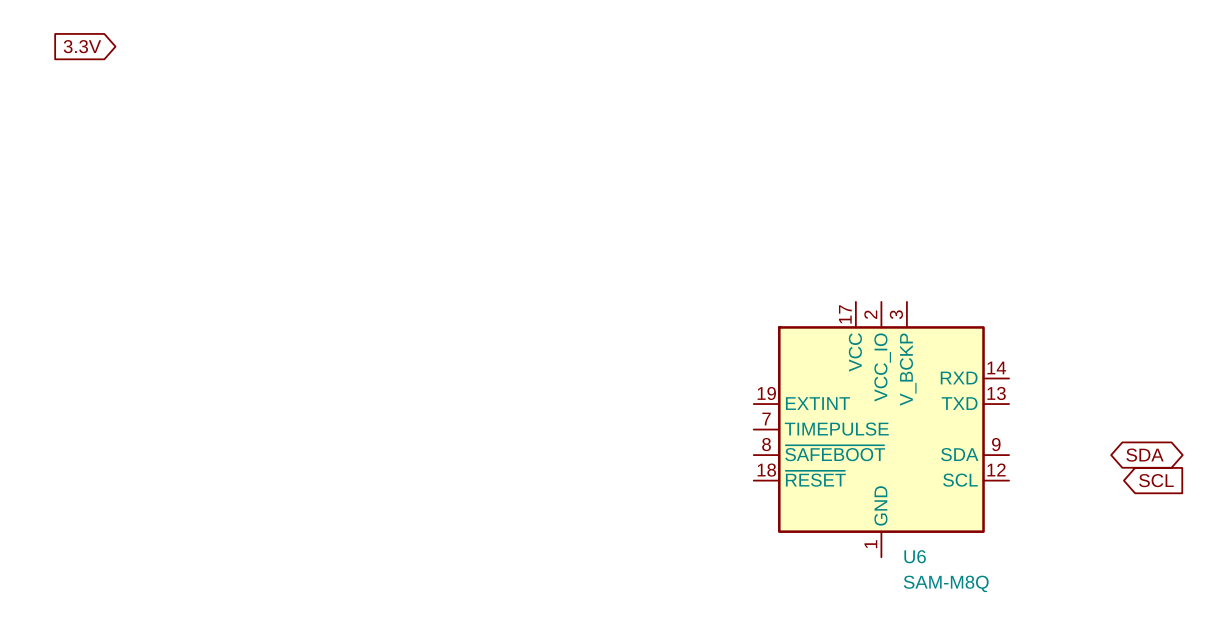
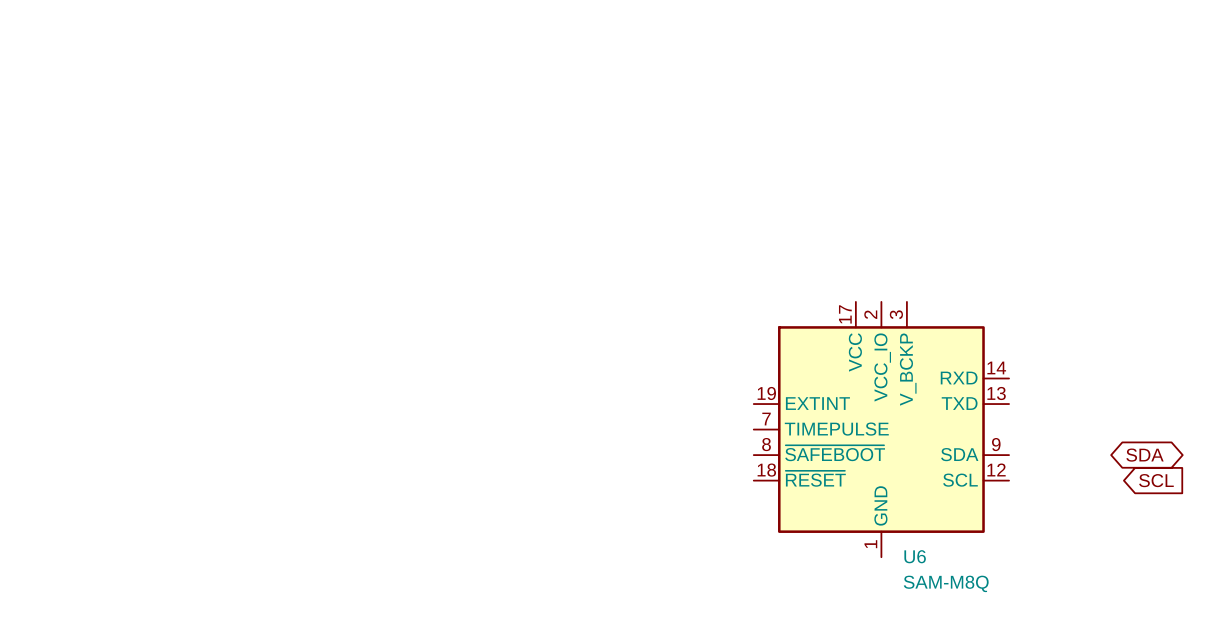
global label: 3.3V (82, 46) -> none

